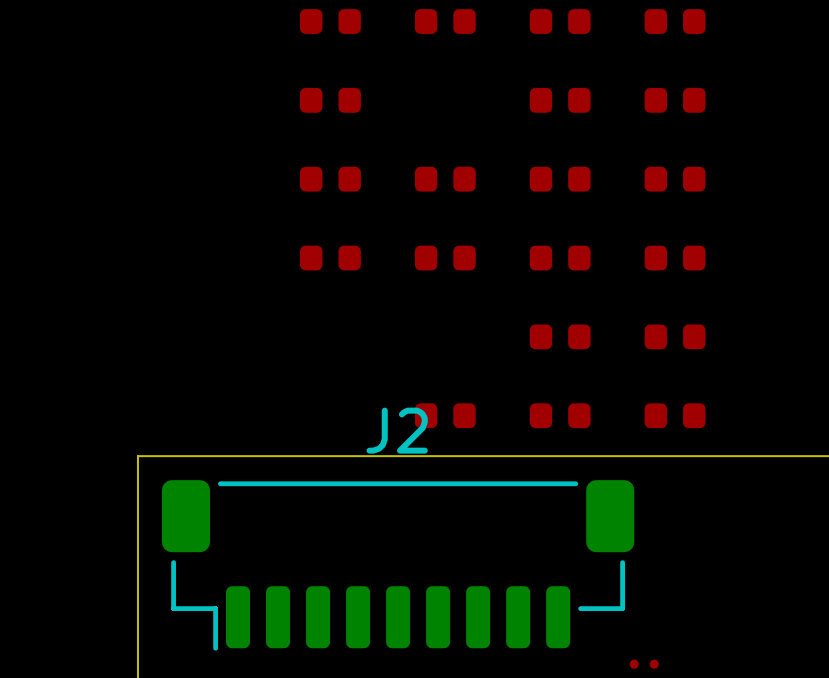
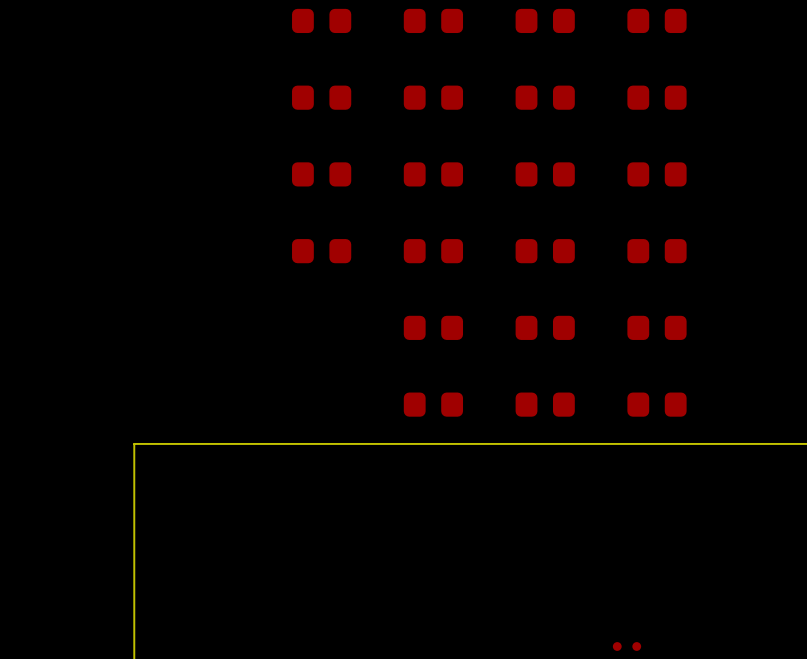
part: none -> (433, 97)
part: none -> (433, 327)
J2: (398, 565) -> none

